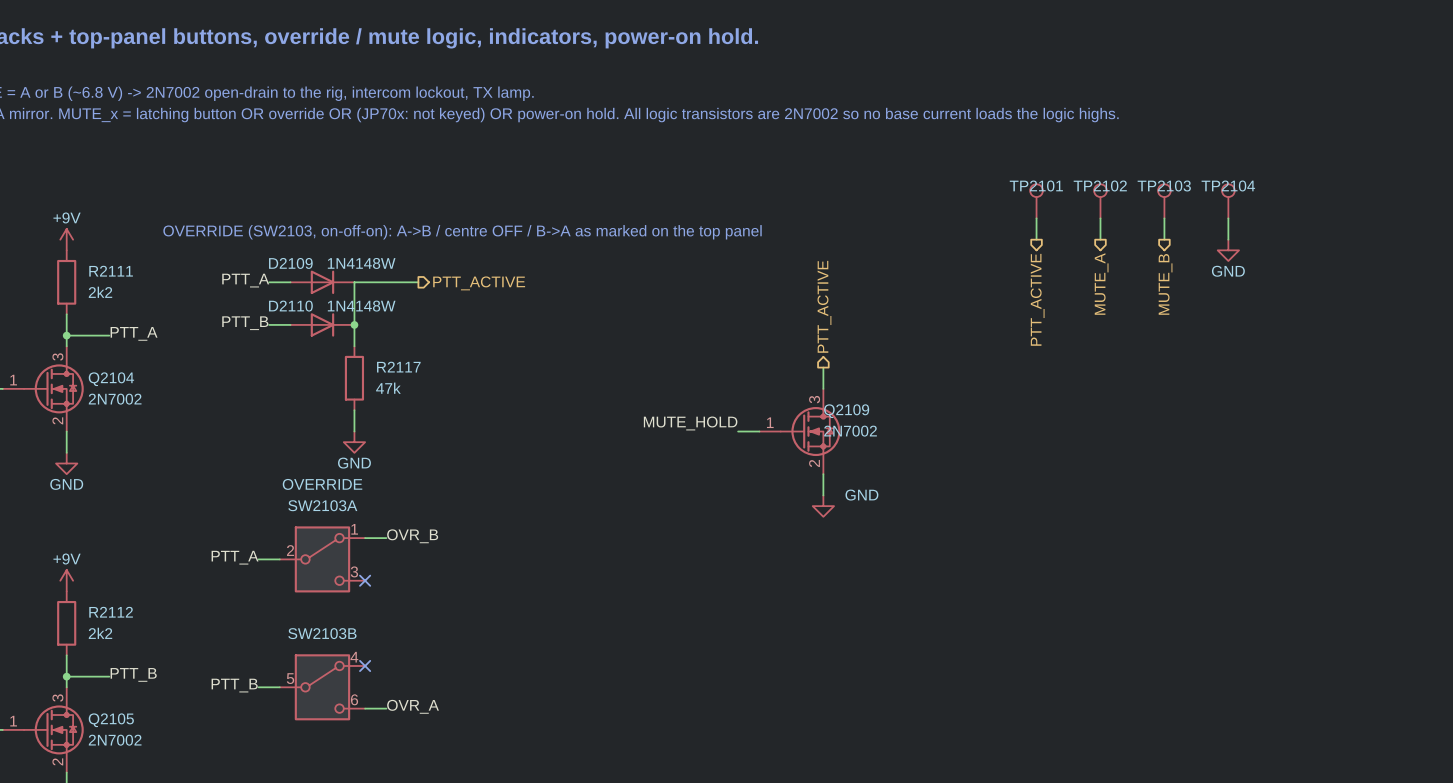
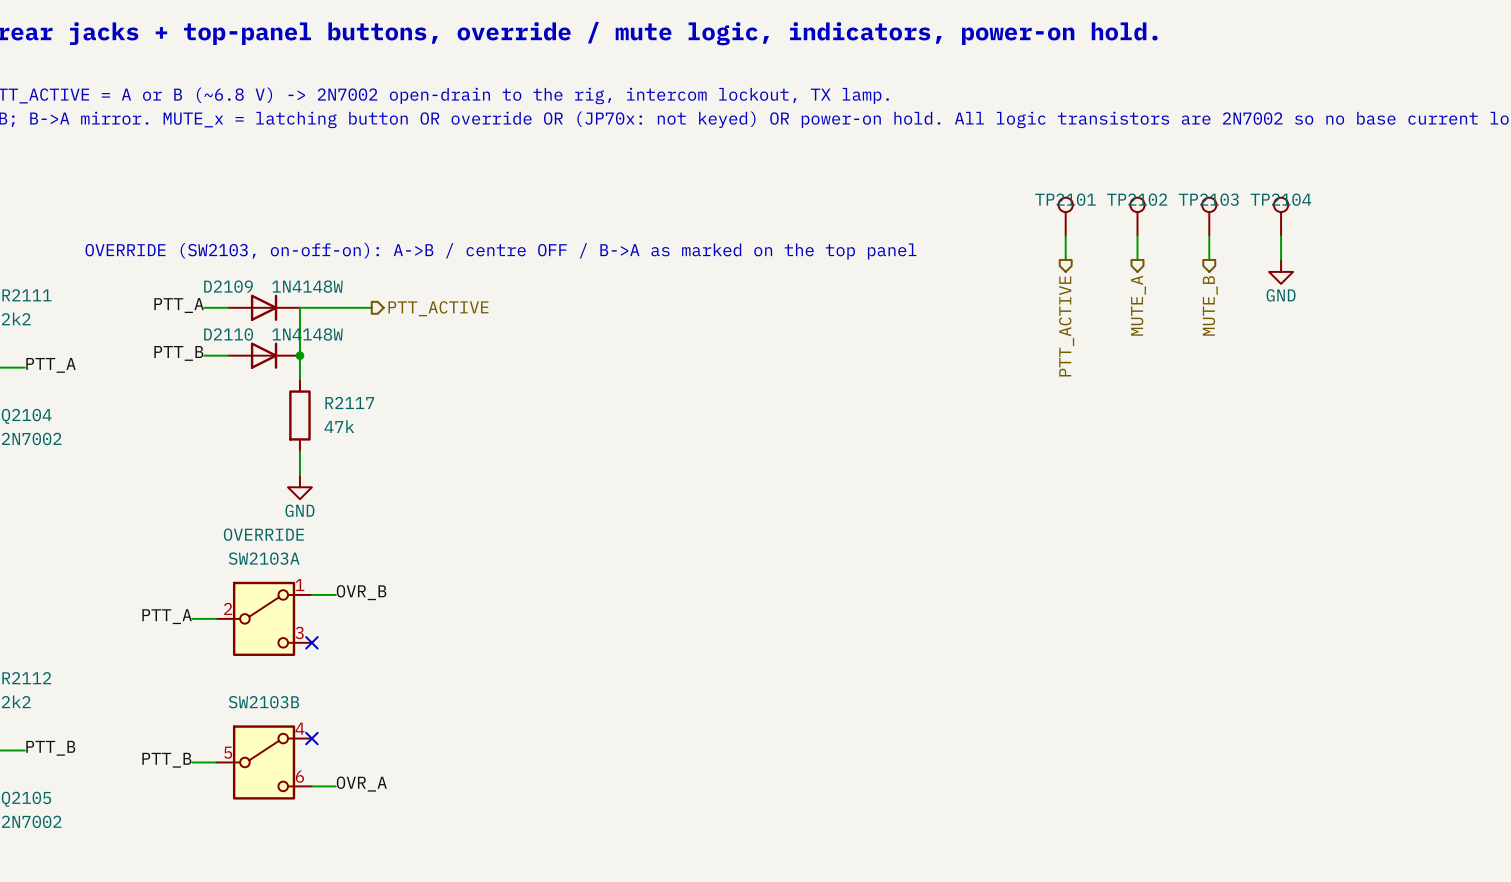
hierarchical label: PTT_ACTIVE (824, 306) -> none
wire: (823, 367) (823, 388) -> none
label: MUTE_HOLD (690, 423) -> none
wire: (738, 431) (759, 431) -> none
Q2109: 2N7002 (799, 431) -> none
wire: (823, 474) (823, 495) -> none
power symbol: GND (823, 506) -> none

